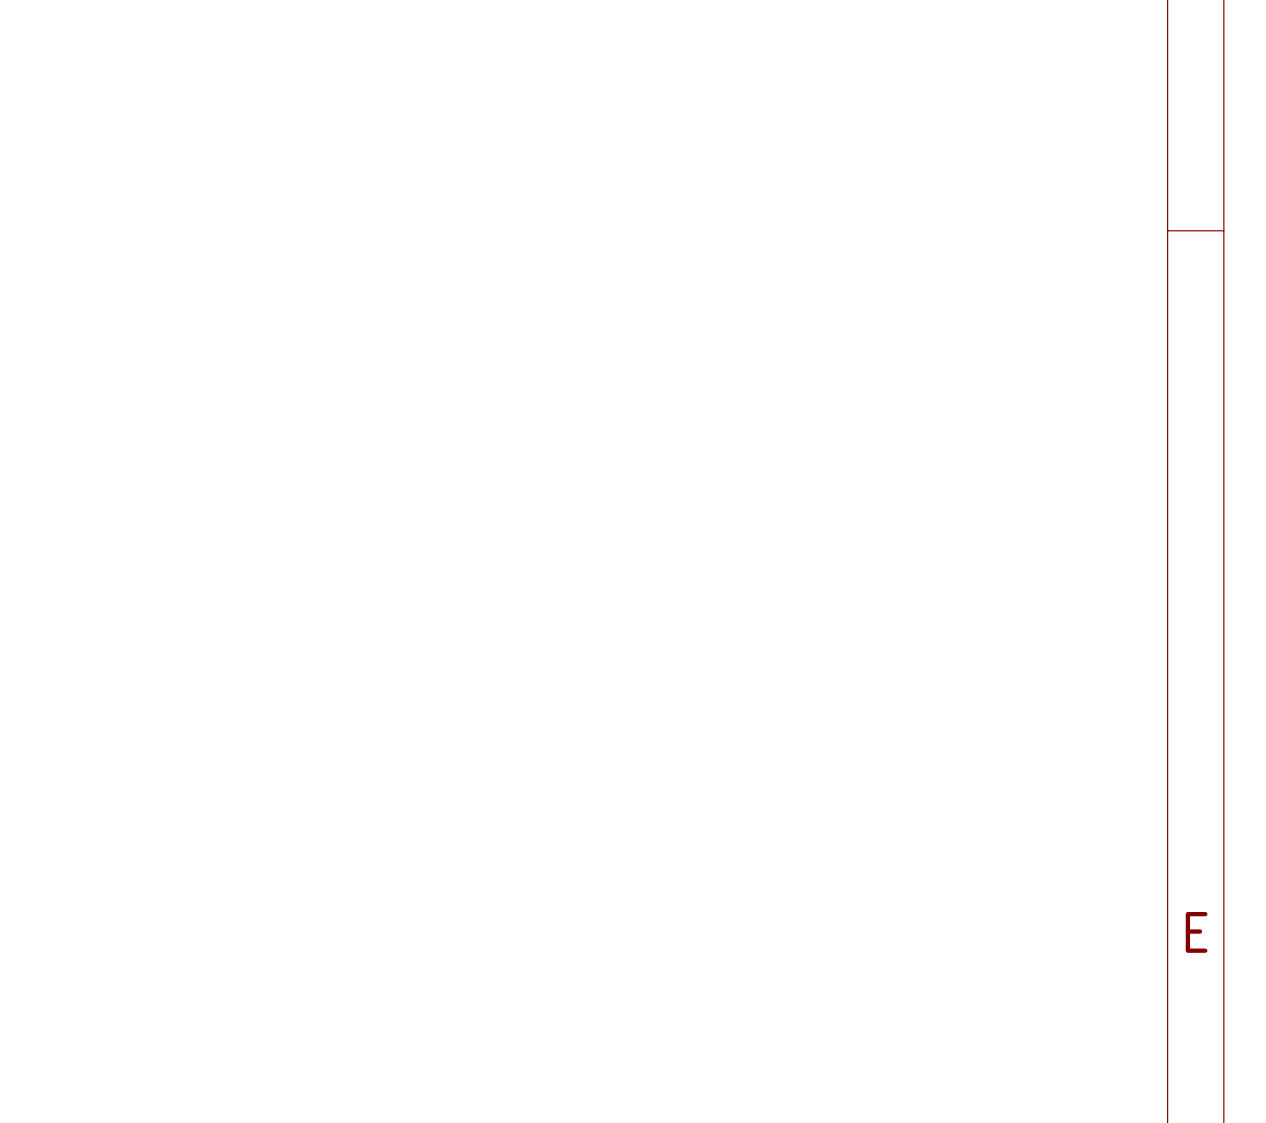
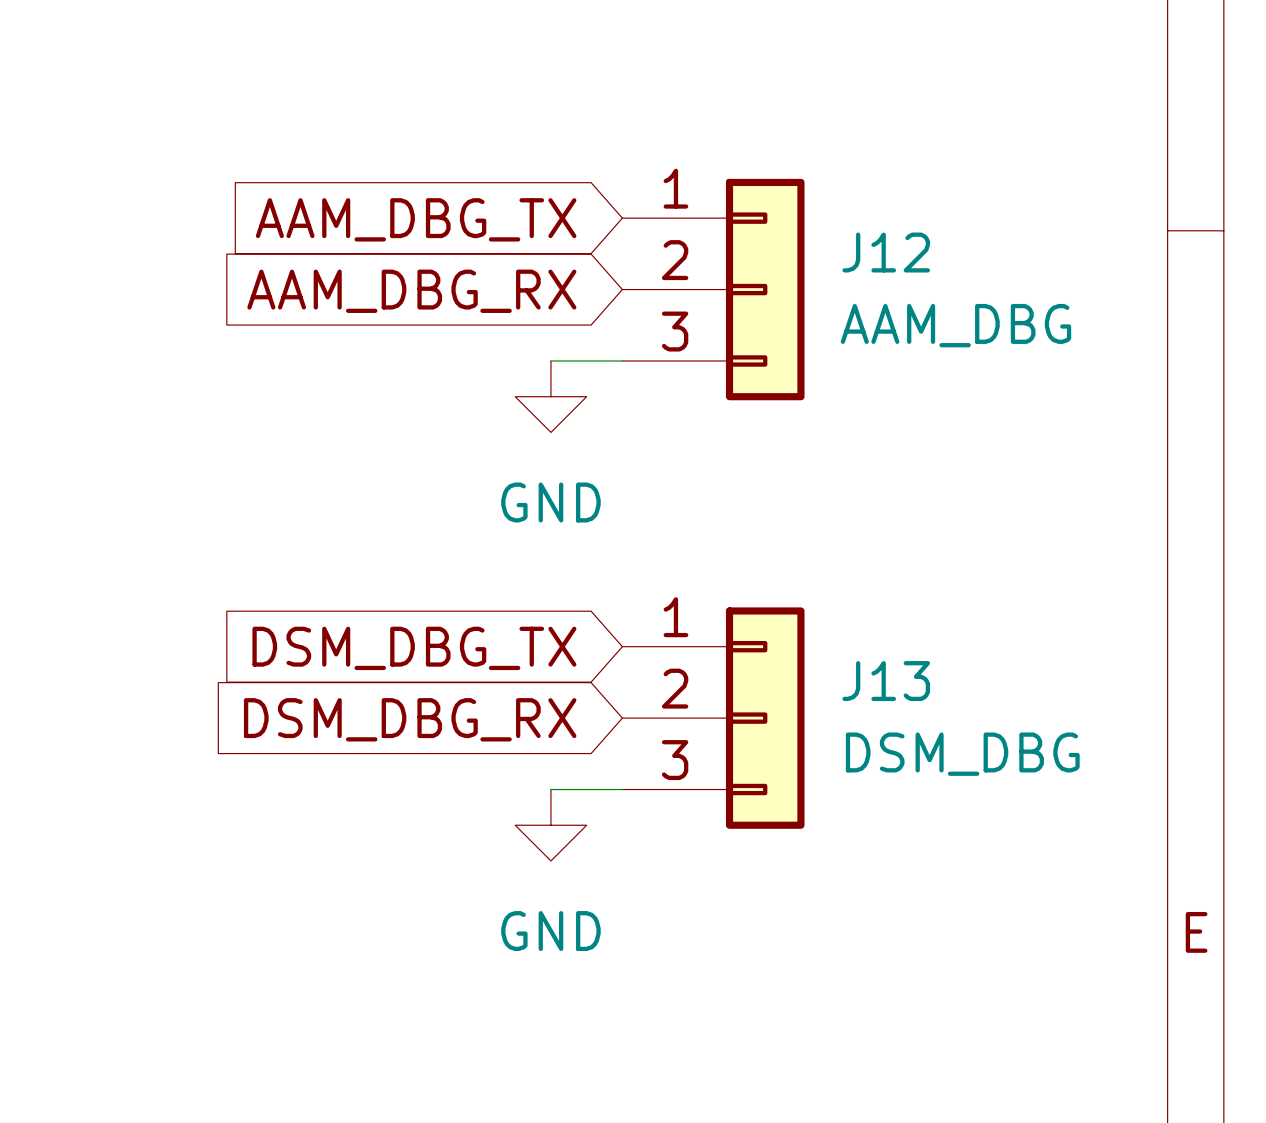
global label: none -> AAM_DBG_TX (416, 219)
J12: none -> AAM_DBG (713, 289)
global label: none -> AAM_DBG_RX (411, 291)
wire: none -> (550, 360) (622, 360)
power symbol: none -> GND (550, 396)
global label: none -> DSM_DBG_TX (414, 648)
J13: none -> DSM_DBG (713, 718)
global label: none -> DSM_DBG_RX (410, 719)
wire: none -> (550, 789) (622, 789)
power symbol: none -> GND (550, 825)

